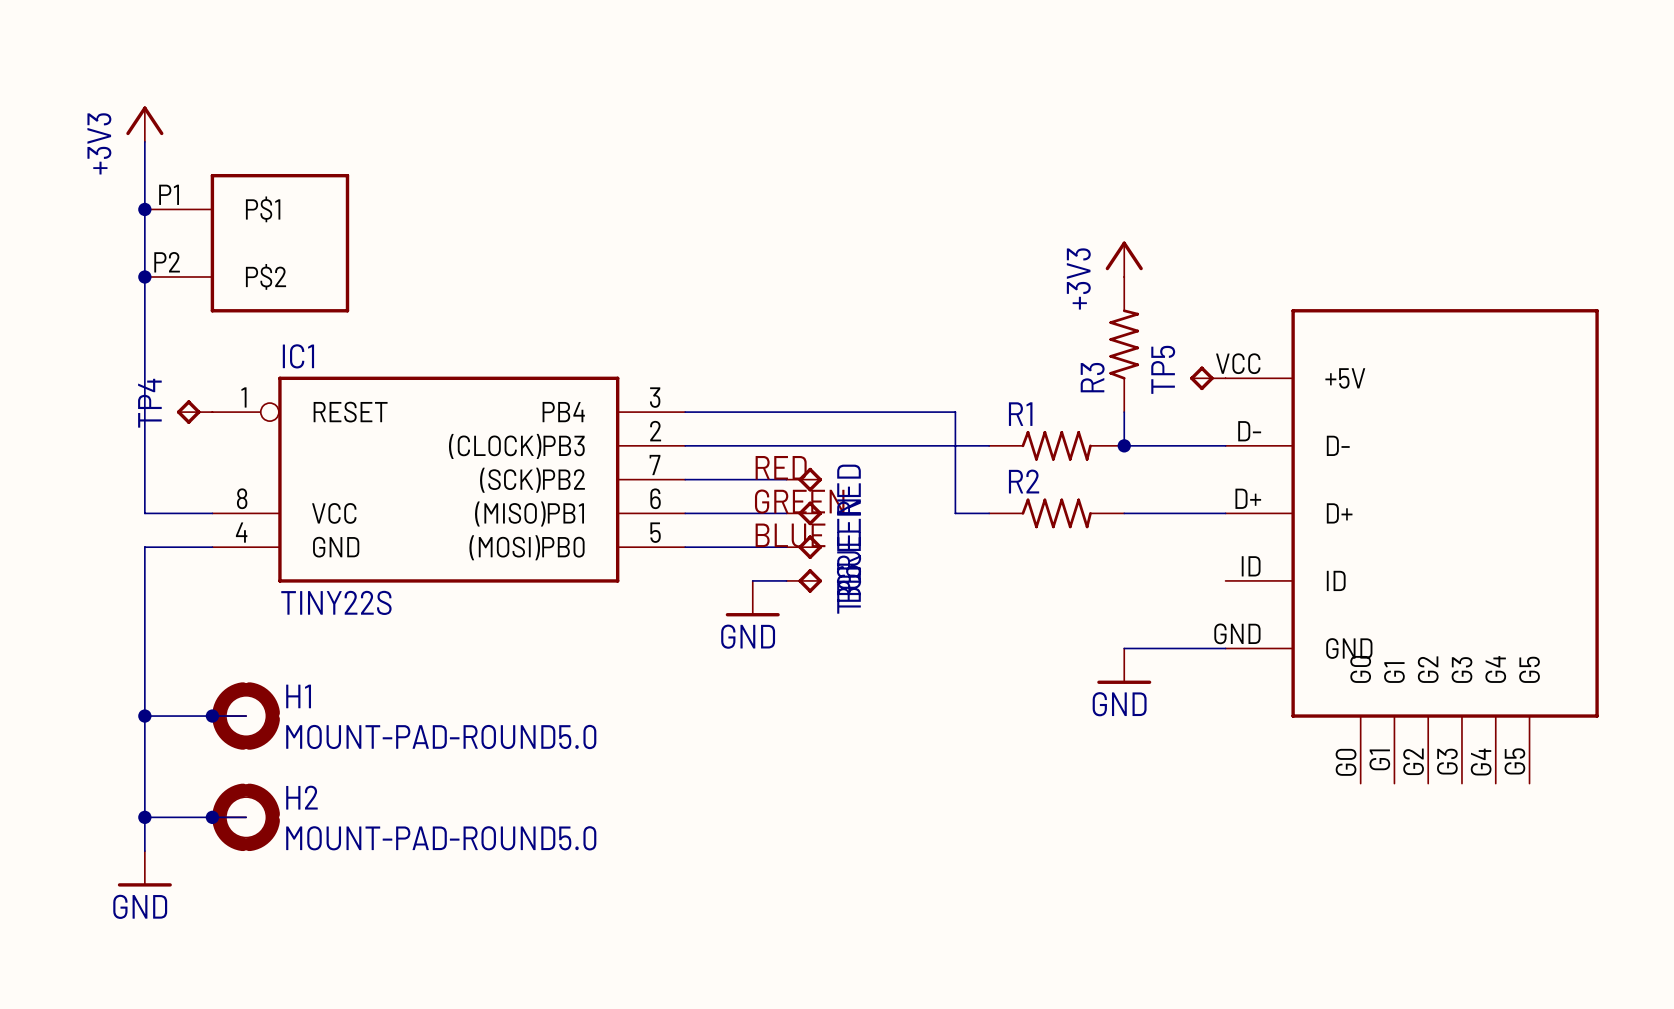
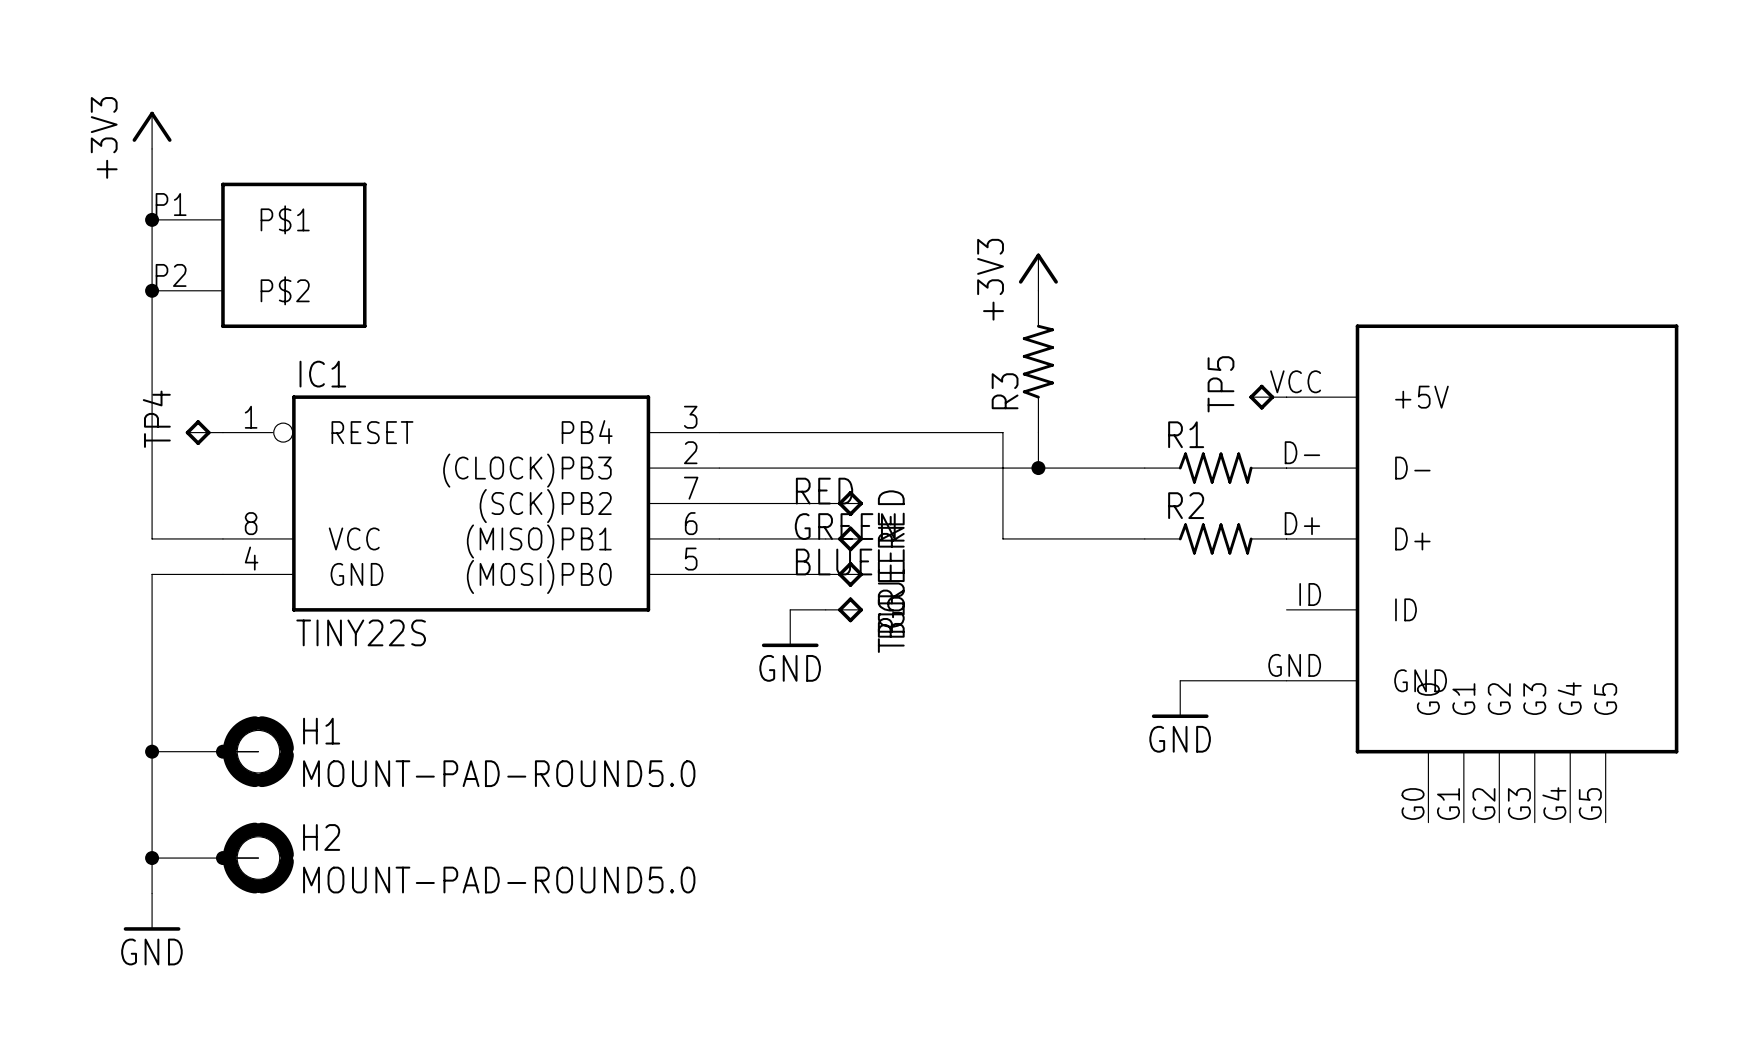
power symbol position: +3V3 (1124, 259) -> +3V3 (1038, 272)
R3 position: (1124, 344) -> (1038, 361)
wire: (1124, 412) (1124, 445) (1225, 445) -> (1038, 432) (1038, 468) (1144, 468)
junction: none -> (1038, 468)
R1 position: (1056, 445) -> (1215, 468)
junction: (1124, 445) -> none
R2 position: (1056, 513) -> (1215, 538)

